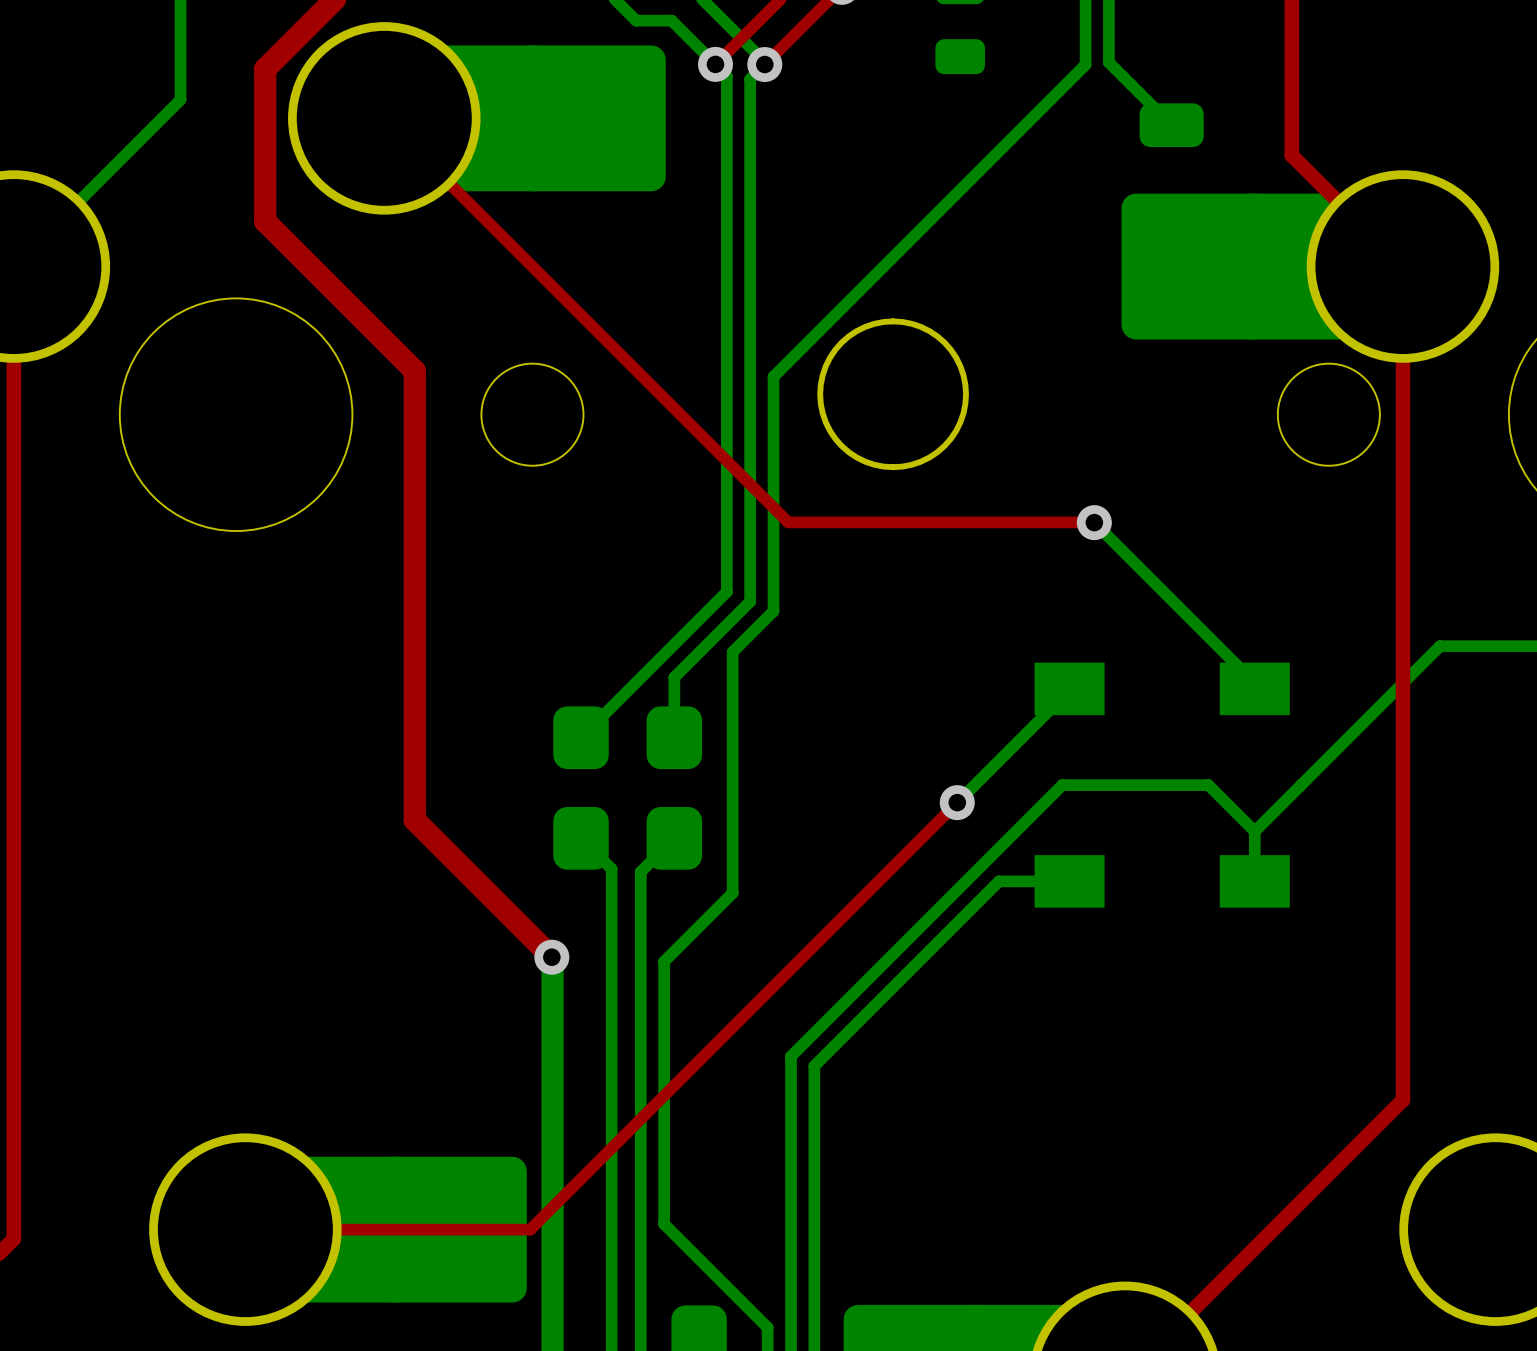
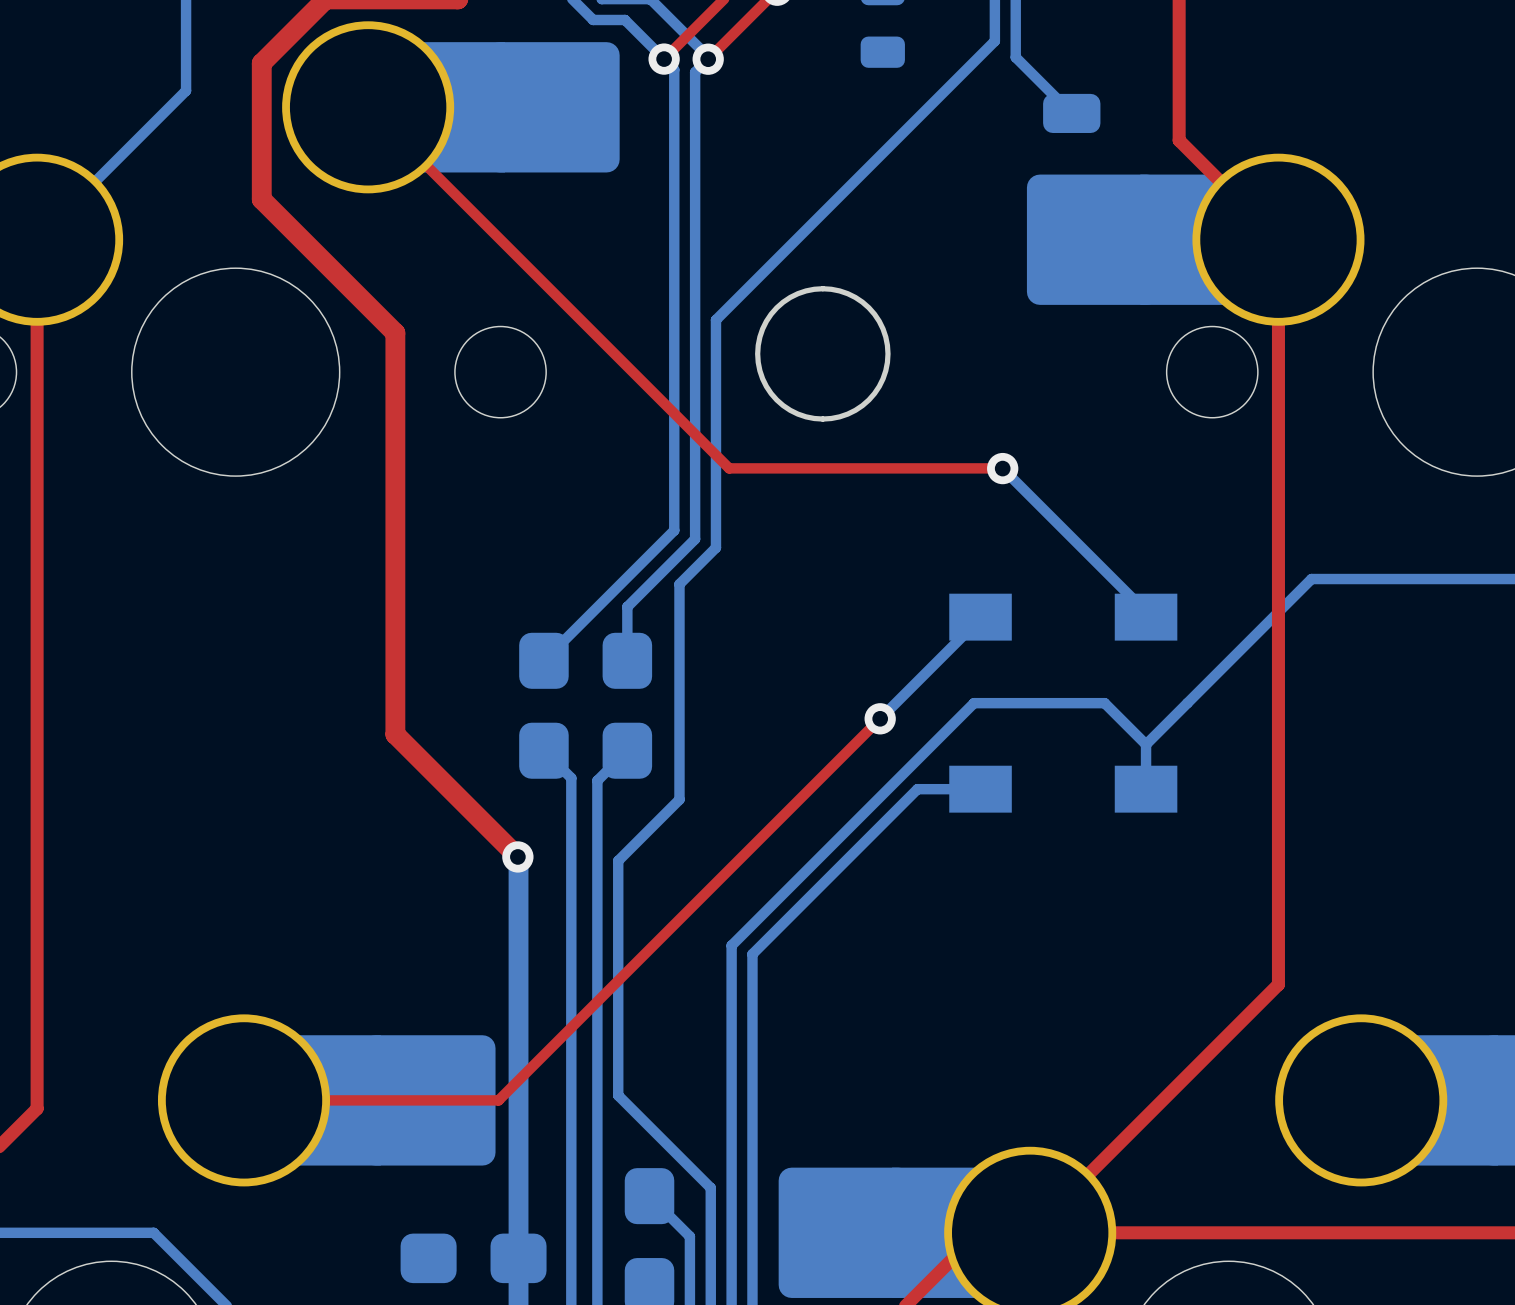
bottom track: (1085, 44) (1085, 64) (773, 376) -> (994, 41) (715, 320) (715, 338)

